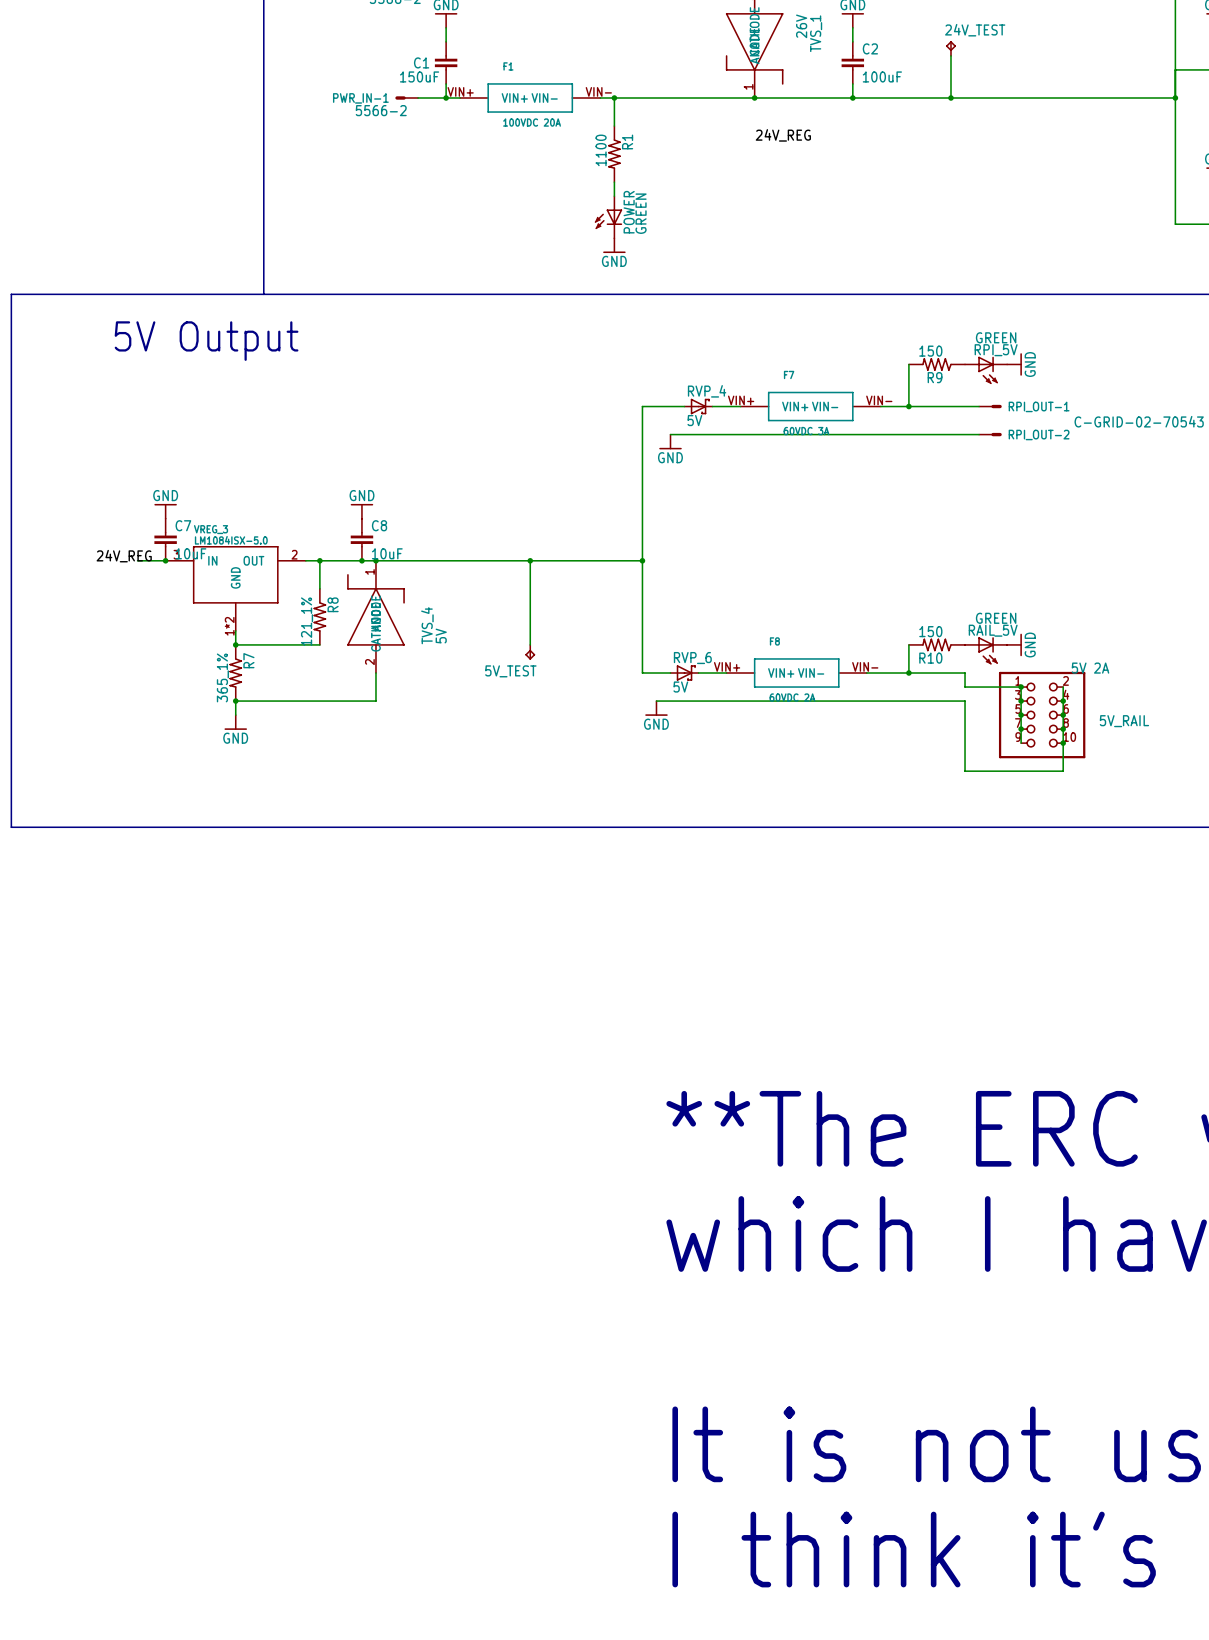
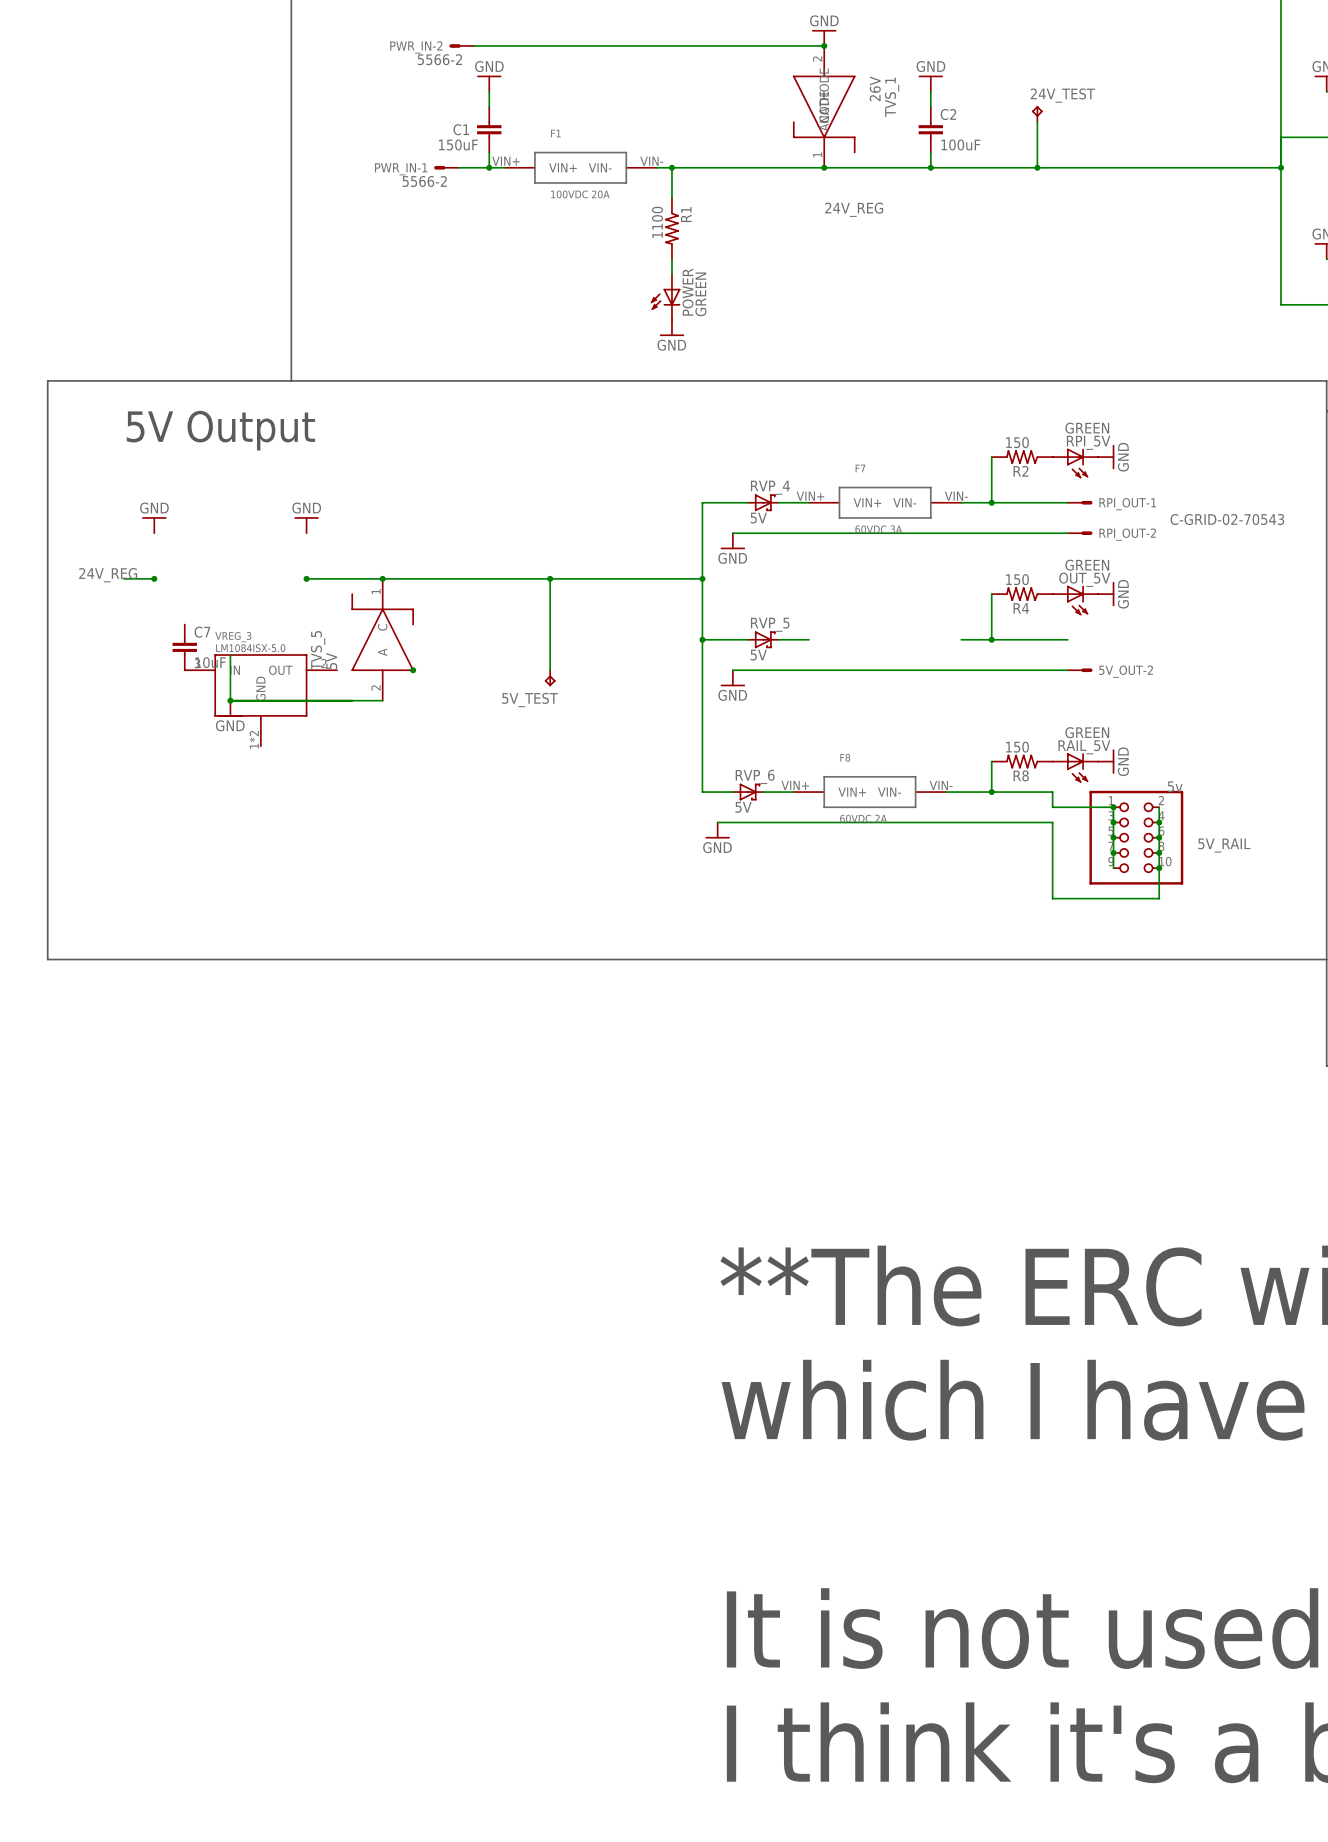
line: (39, 294) (11, 294) (11, 827) (39, 827) -> (47, 380) (47, 959)
R9 name: R9 (935, 377) -> R2 (1021, 471)
power symbol: none -> GND (154, 525)
power symbol: none -> GND (306, 525)
junction: none -> (154, 578)
wire: none -> (306, 578) (702, 578)
junction: none -> (306, 578)
junction: none -> (382, 578)
junction: none -> (550, 578)
junction: none -> (702, 578)
wire: none -> (991, 594) (991, 639)
R4: none -> 150 (1022, 594)
power symbol: none -> GND (1106, 594)
OUT_5V: none -> GREEN (1075, 600)
power symbol: GND (165, 511) -> none
power symbol: GND (361, 511) -> none
TVS_5: none -> 5V (382, 639)
wire: none -> (702, 639) (748, 639)
RVP_5: none -> 5V (763, 639)
wire: none -> (778, 639) (809, 639)
wire: none -> (961, 639) (1067, 639)
junction: none -> (991, 639)
C8: 10uF (361, 539) -> none
wire: none -> (230, 655) (230, 700) (382, 700)
label position: 24V_REG (124, 556) -> 24V_REG (108, 575)
wire: (137, 560) (165, 560) -> (123, 578) (154, 578)
junction: (165, 560) -> none
wire: (305, 560) (642, 560) -> none
wire: (319, 560) (319, 588) -> none
junction: (319, 560) -> none
junction: (361, 560) -> none
wire: (530, 560) (530, 644) -> (550, 578) (550, 670)
junction: (530, 560) -> none
junction position: (642, 560) -> (702, 639)
wire: none -> (732, 670) (1067, 670)
5V_OUT-2: none -> (1080, 670)
power symbol: none -> GND (732, 678)
junction: none -> (230, 700)
power symbol: none -> GND (230, 708)
R8: 121_1% (319, 616) -> none
TVS_4: 5V (375, 616) -> none
wire: (235, 630) (235, 644) (319, 644) -> none
junction: (235, 644) -> none
5V_TEST position: (530, 652) -> (550, 678)
R10 name: R10 (930, 658) -> R8 (1021, 775)
5V_RAIL value: 5V 2A (1090, 668) -> 5v (1175, 786)
R7: 365_1% (235, 673) -> none
wire: (375, 673) (375, 701) (235, 701) (235, 715) -> none
junction: (235, 701) -> none
power symbol: GND (235, 722) -> none

